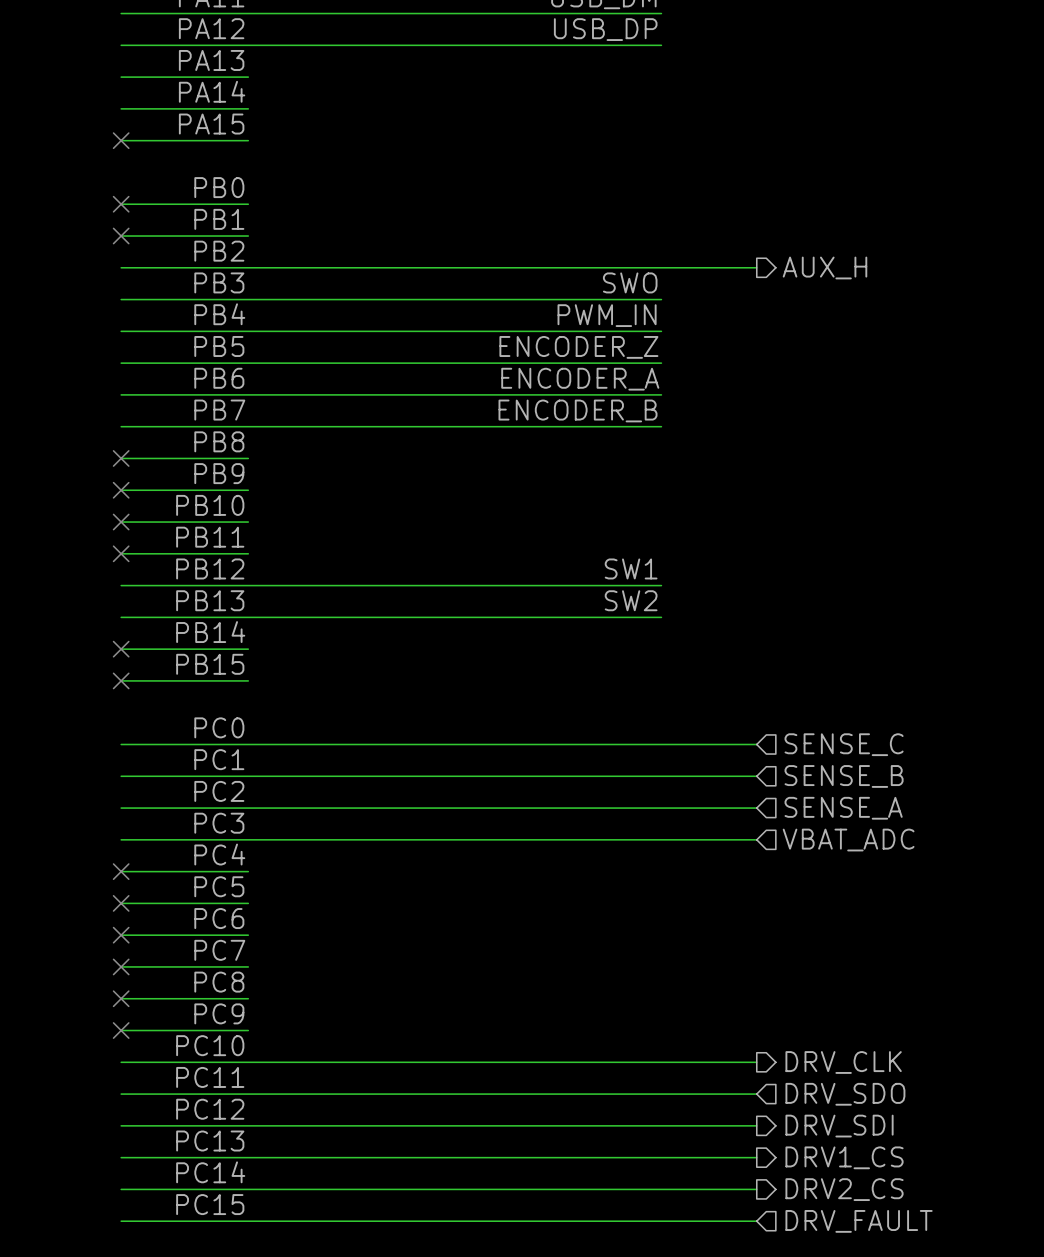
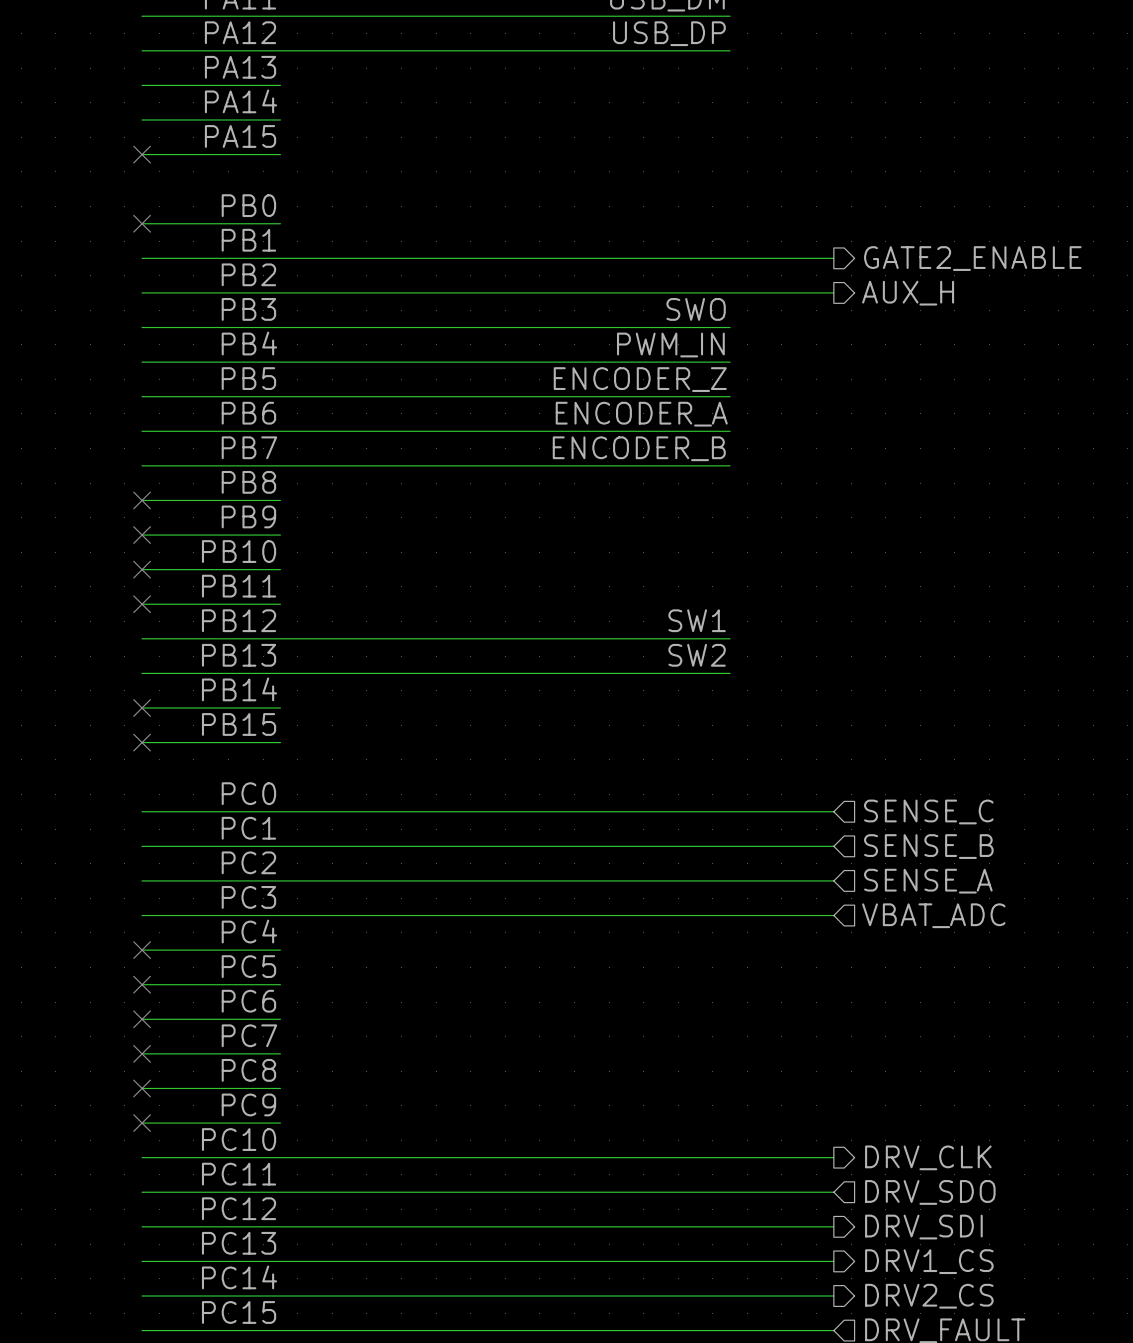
no-connect mark: (121, 236) -> none
wire: none -> (280, 258) (833, 258)
hierarchical label: none -> GATE2_ENABLE (972, 258)

